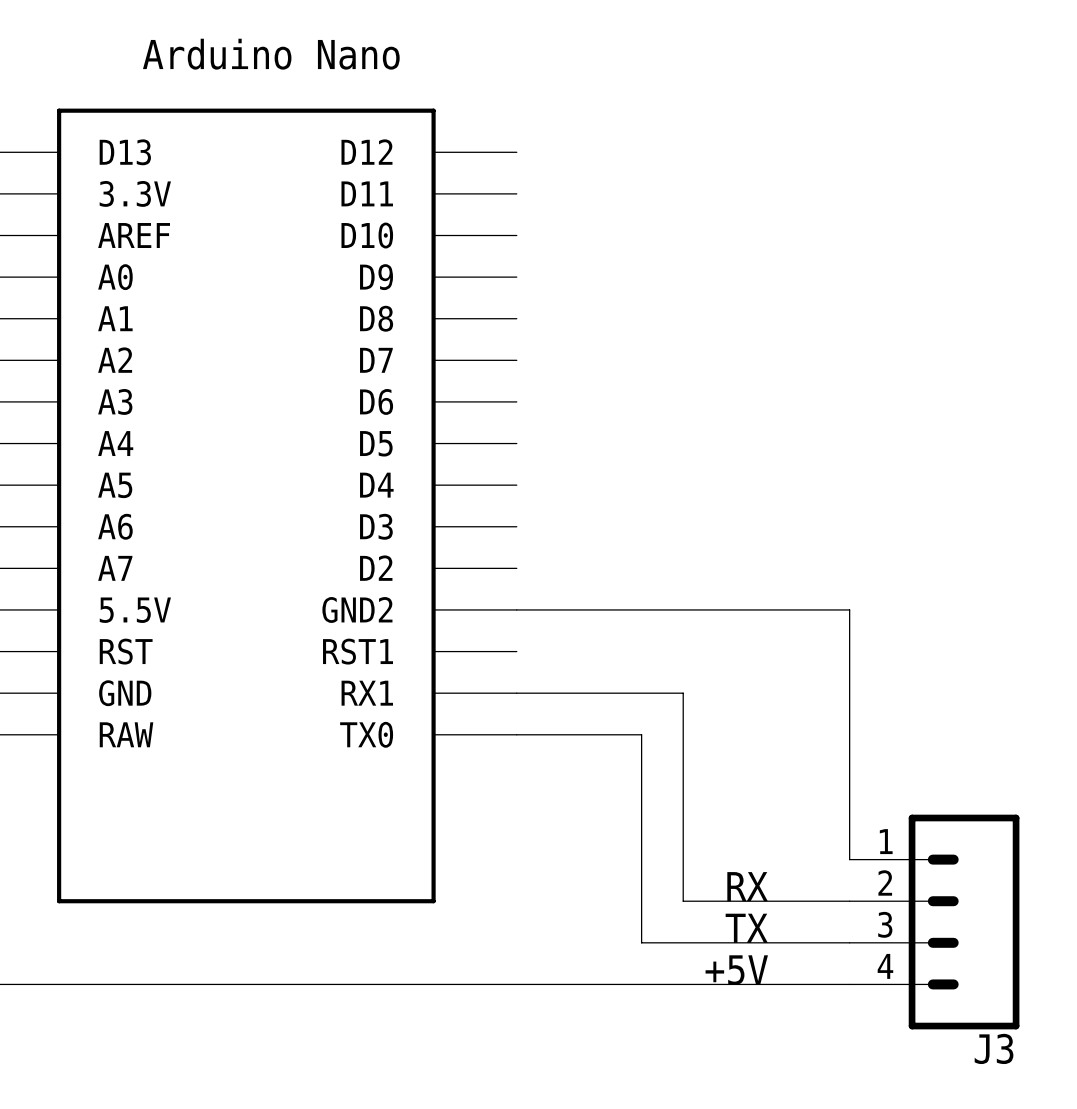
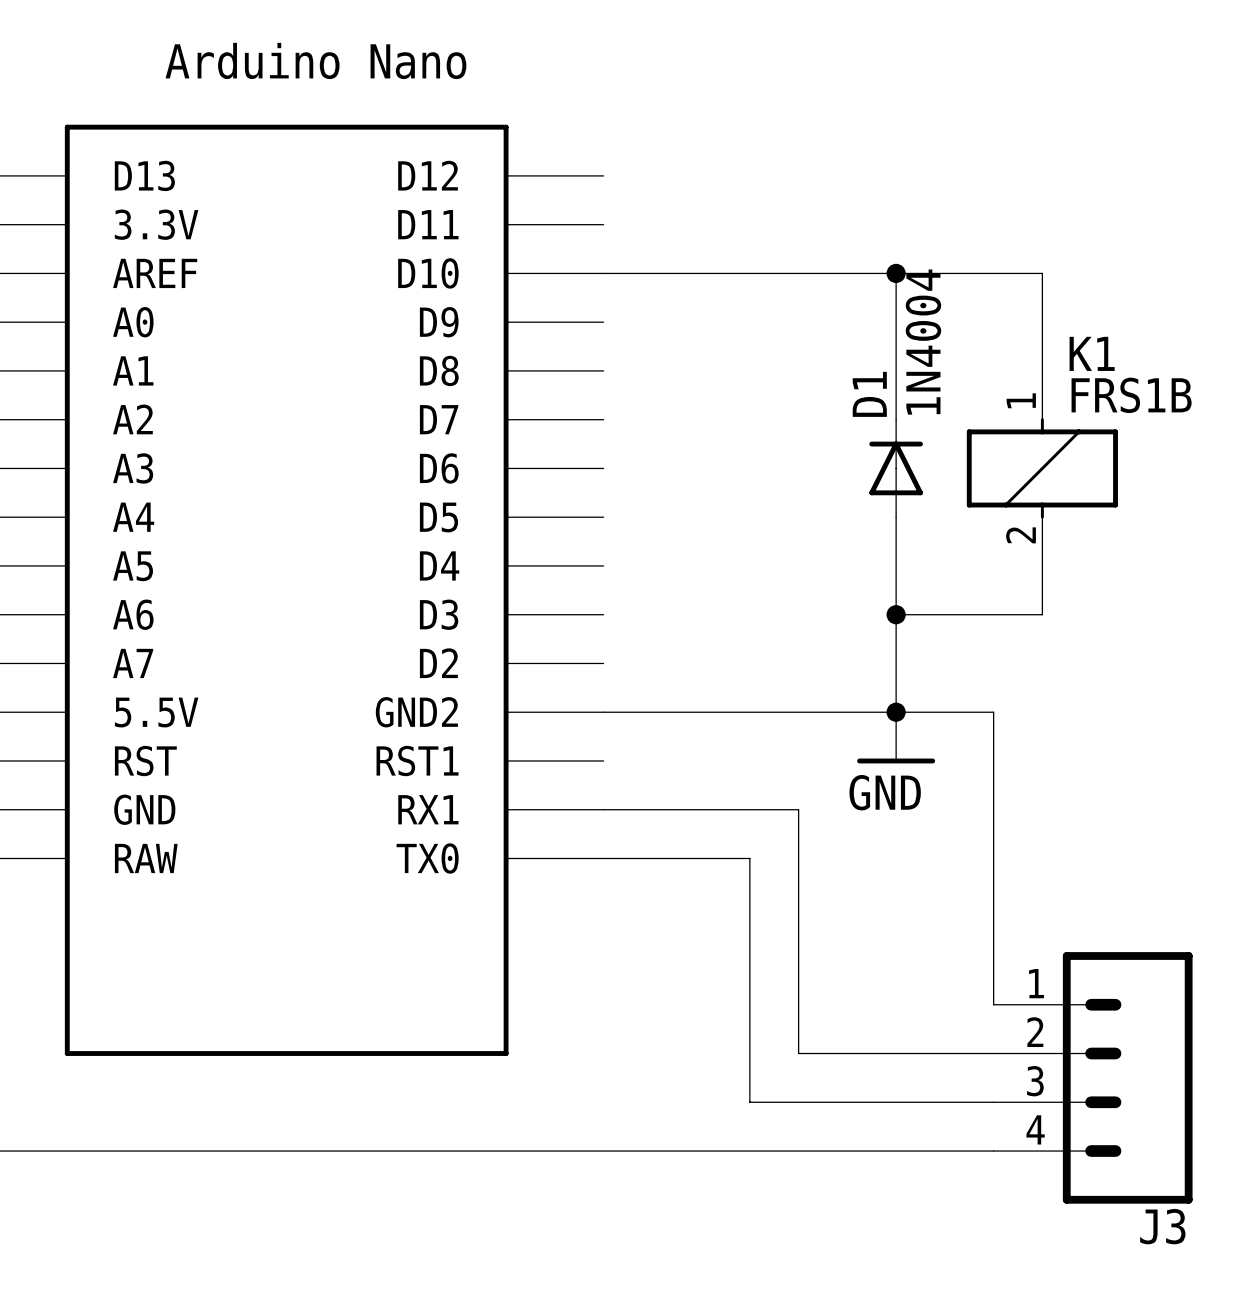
wire: none -> (603, 273) (1042, 273) (1042, 370)
wire: none -> (896, 273) (896, 419)
junction: none -> (896, 273)
D1: none -> 1N4004 (896, 468)
K1: none -> FRS1B (1042, 468)
wire: none -> (896, 517) (896, 712)
wire: none -> (1042, 565) (1042, 614) (896, 614)
junction: none -> (896, 614)
junction: none -> (896, 712)
power symbol: none -> GND (896, 737)
label: RX (747, 886) -> none
label: TX (746, 928) -> none
label: +5V (736, 970) -> none

